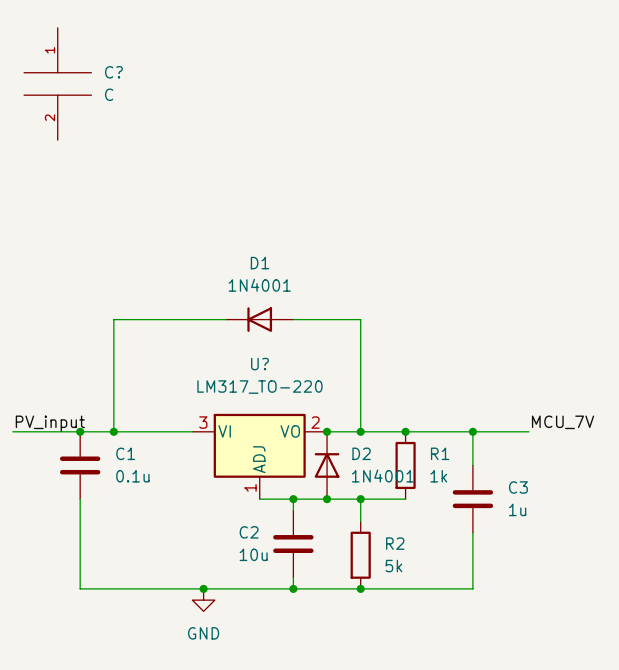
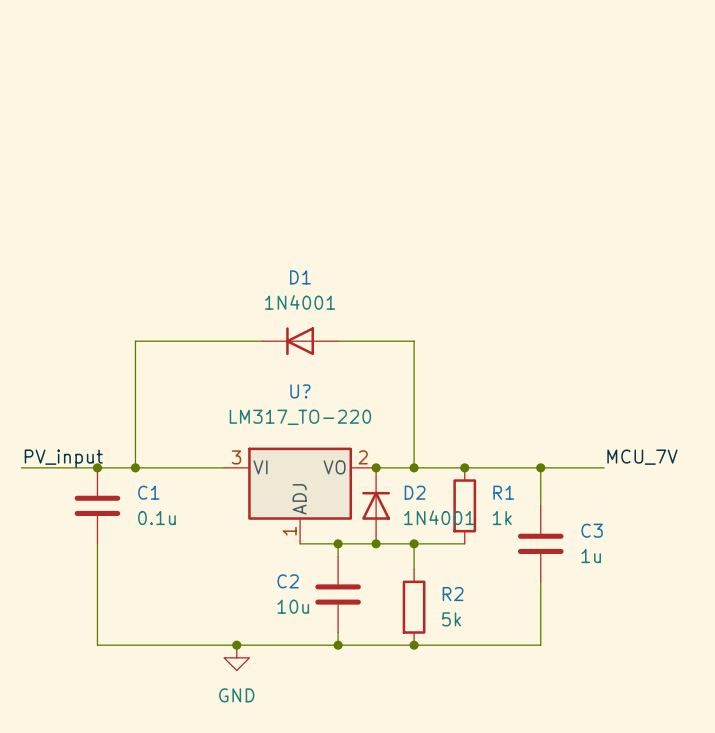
C?: C (57, 83) -> none

